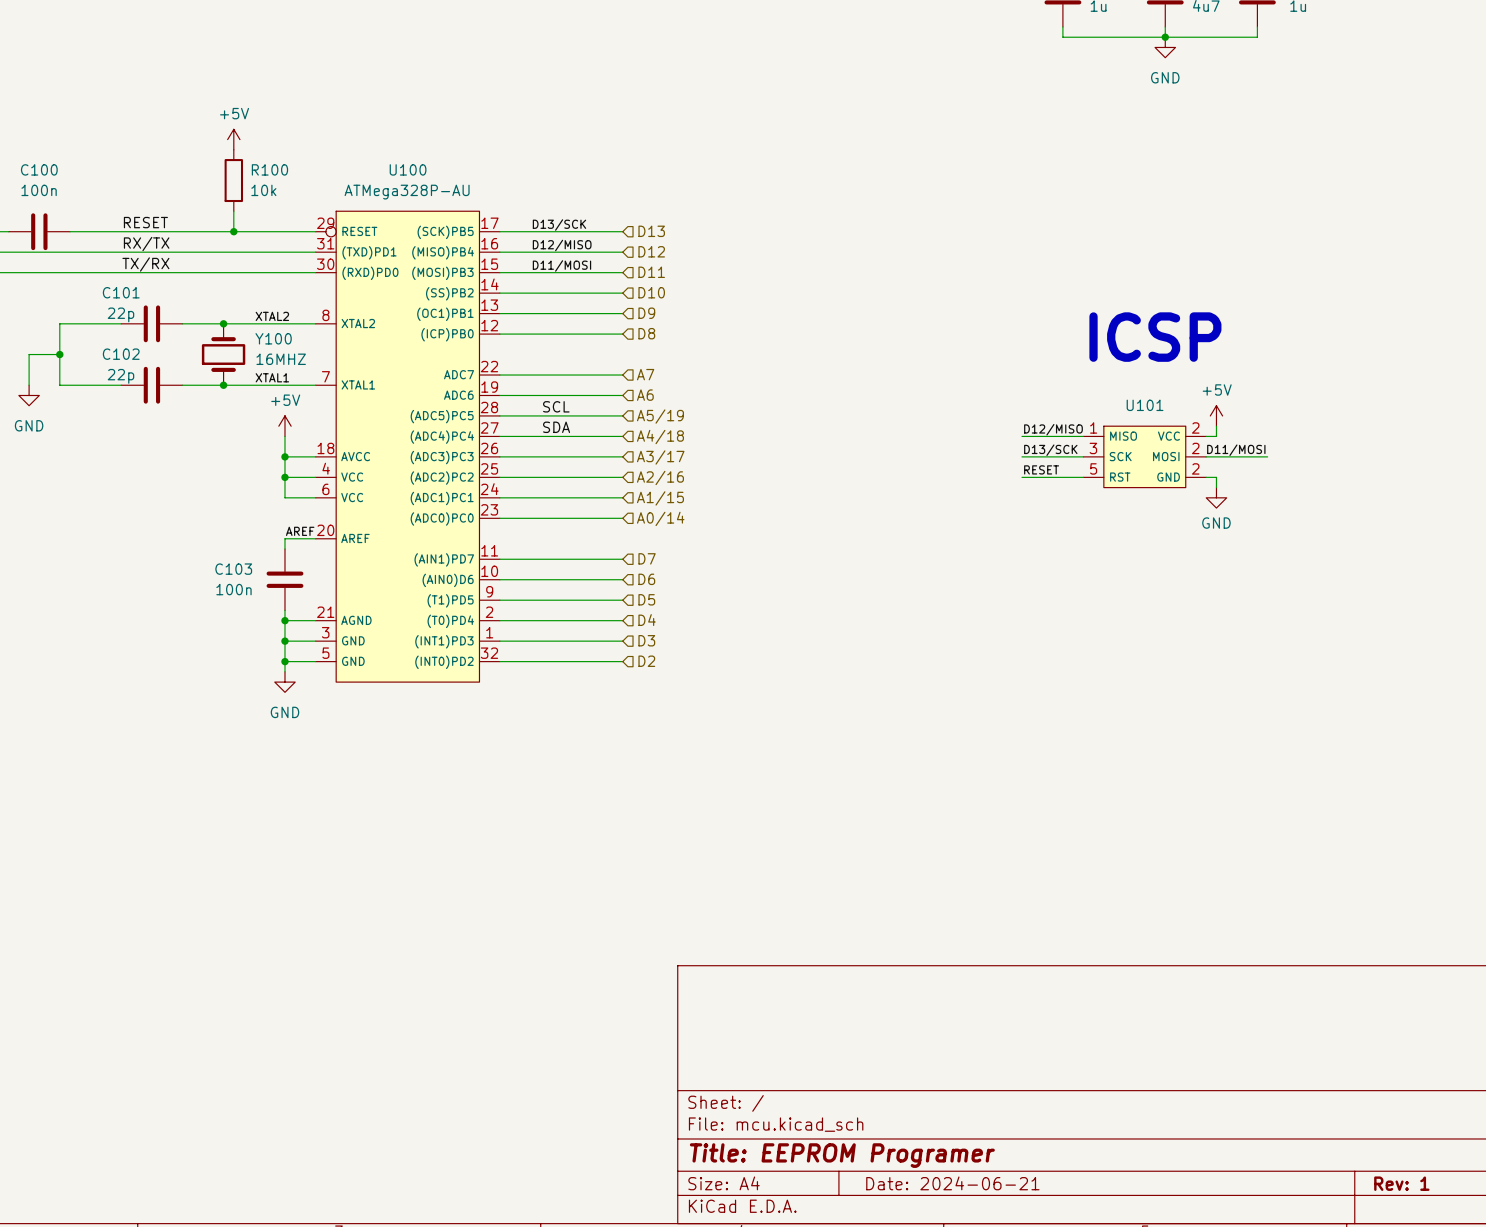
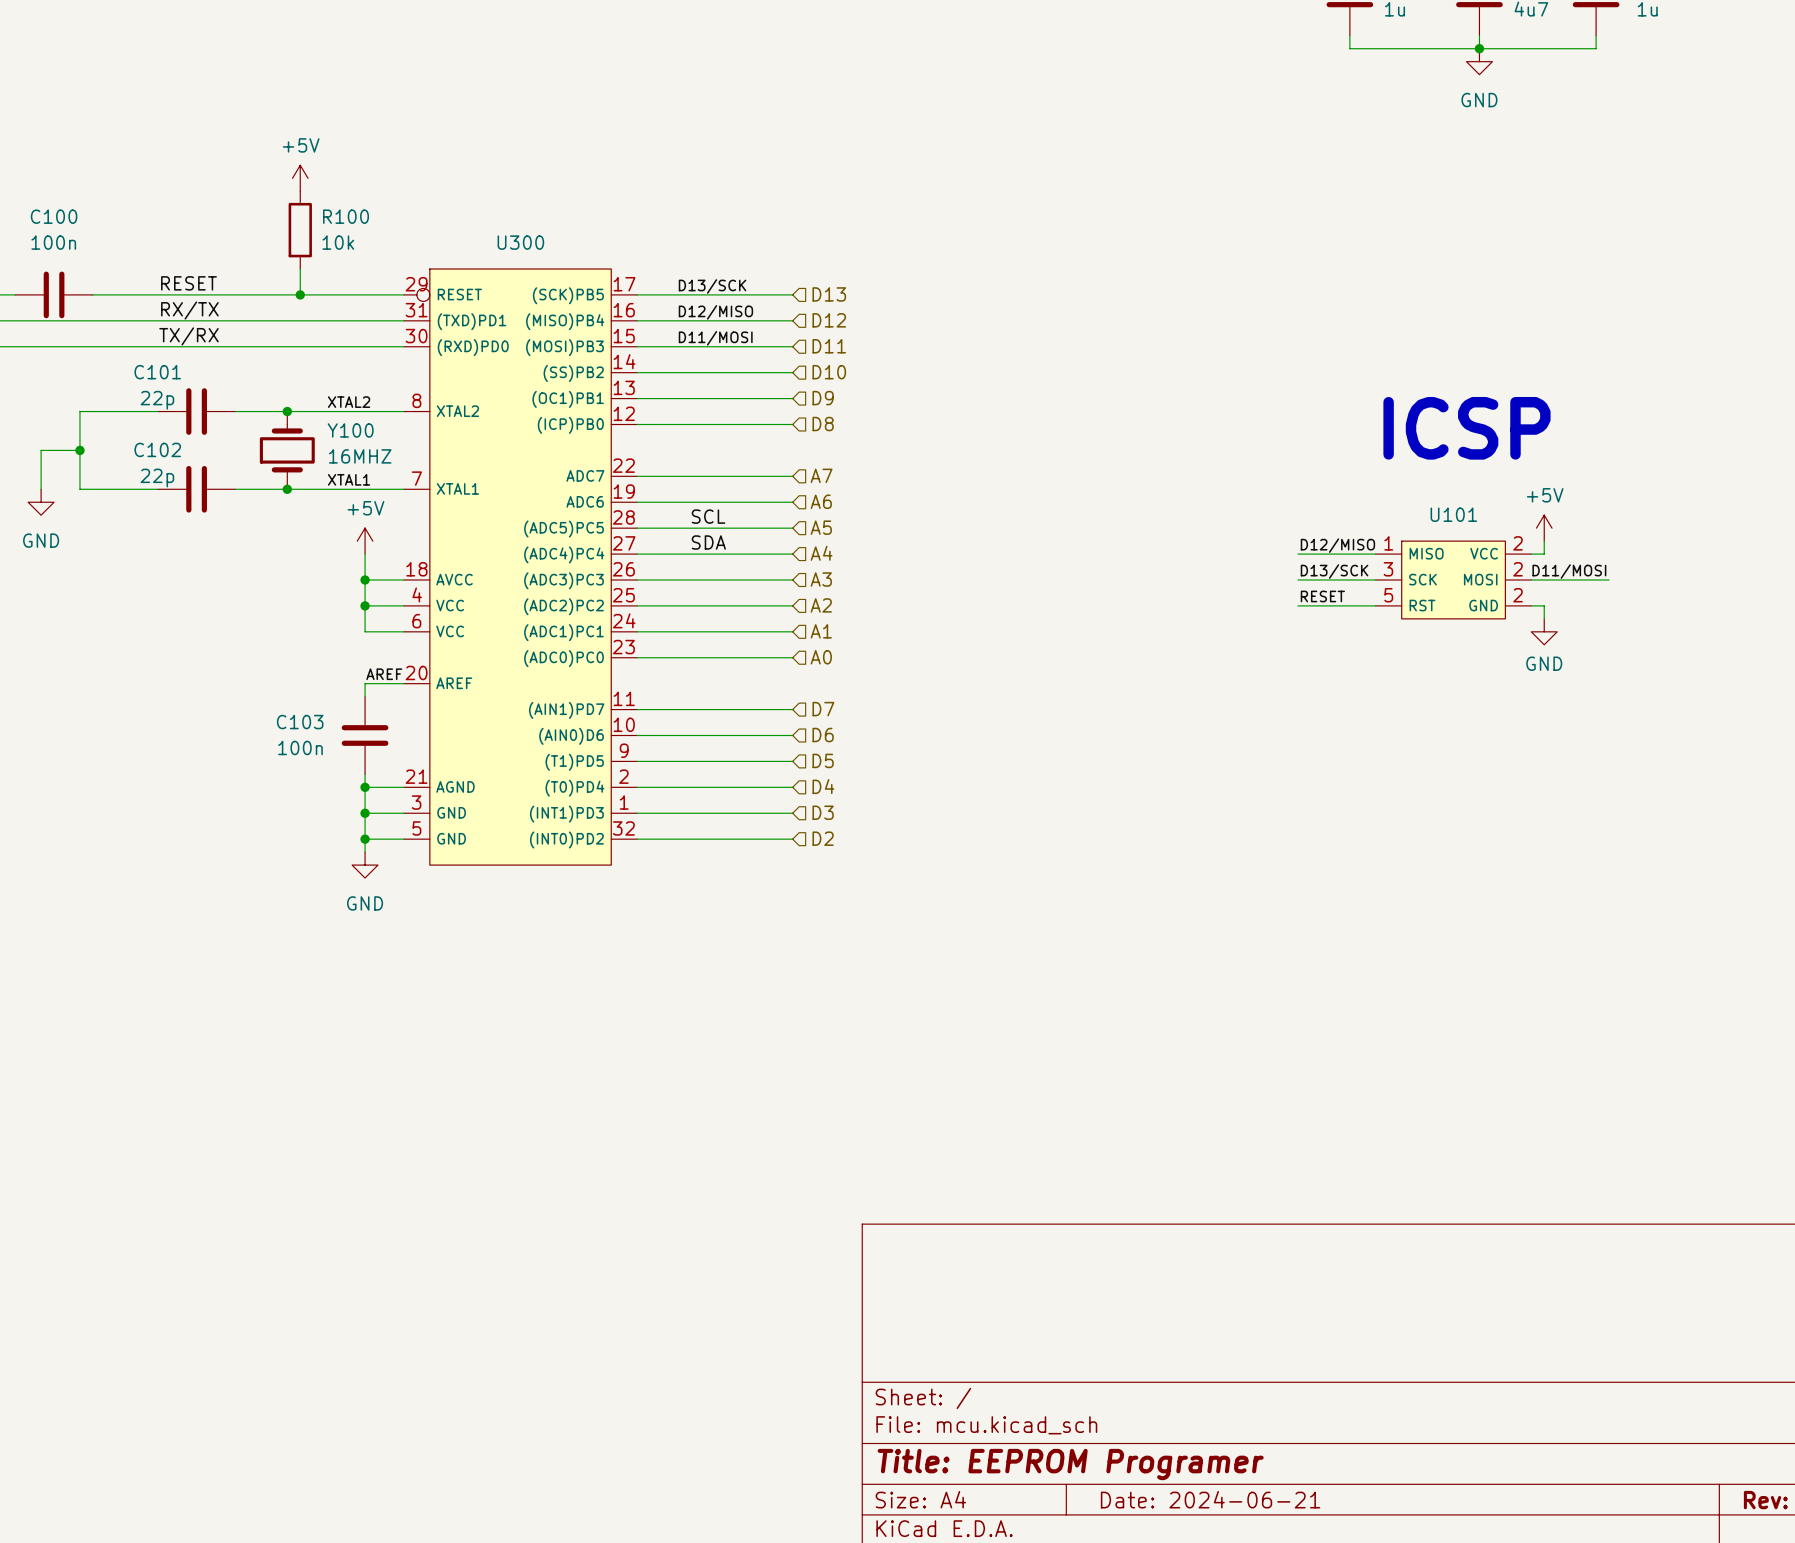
U100 name: U100 (408, 169) -> U300 (520, 242)
U100 value: ATMega328P-AU (407, 192) -> none
hierarchical label: A5/19 (660, 416) -> A5 (821, 527)
hierarchical label: A4/18 (660, 437) -> A4 (821, 553)
hierarchical label: A3/17 (660, 457) -> A3 (821, 579)
hierarchical label: A2/16 (660, 477) -> A2 (821, 605)
hierarchical label: A1/15 (660, 498) -> A1 (821, 631)
hierarchical label: A0/14 (660, 518) -> A0 (821, 657)

